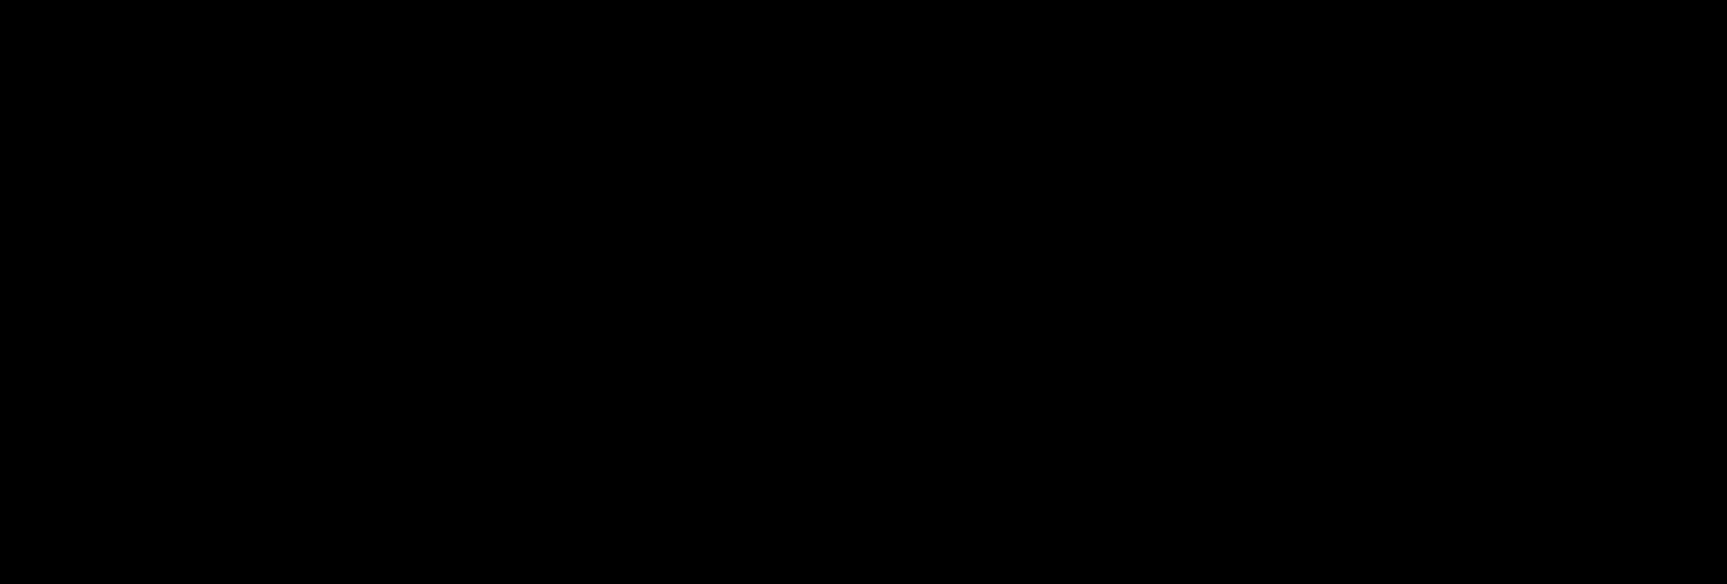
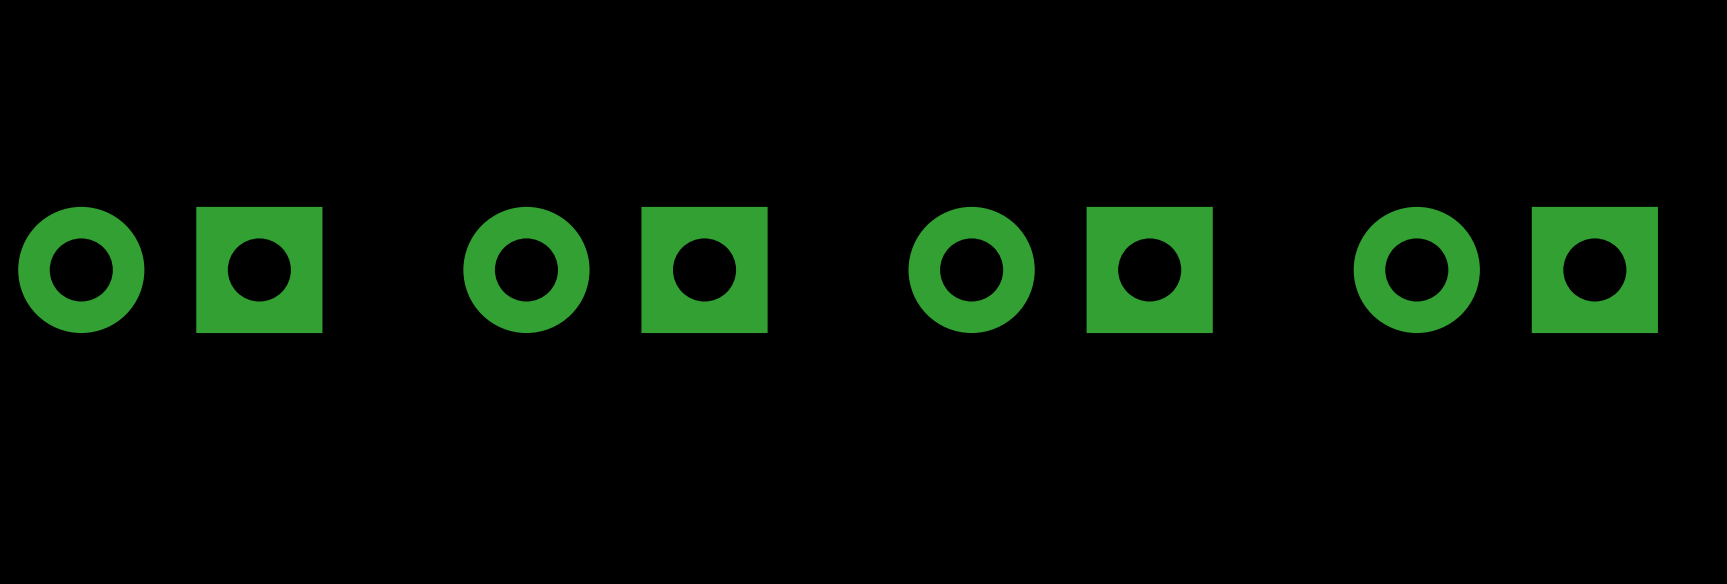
part: none -> (170, 269)
part: none -> (615, 269)
part: none -> (1060, 269)
part: none -> (1505, 269)

